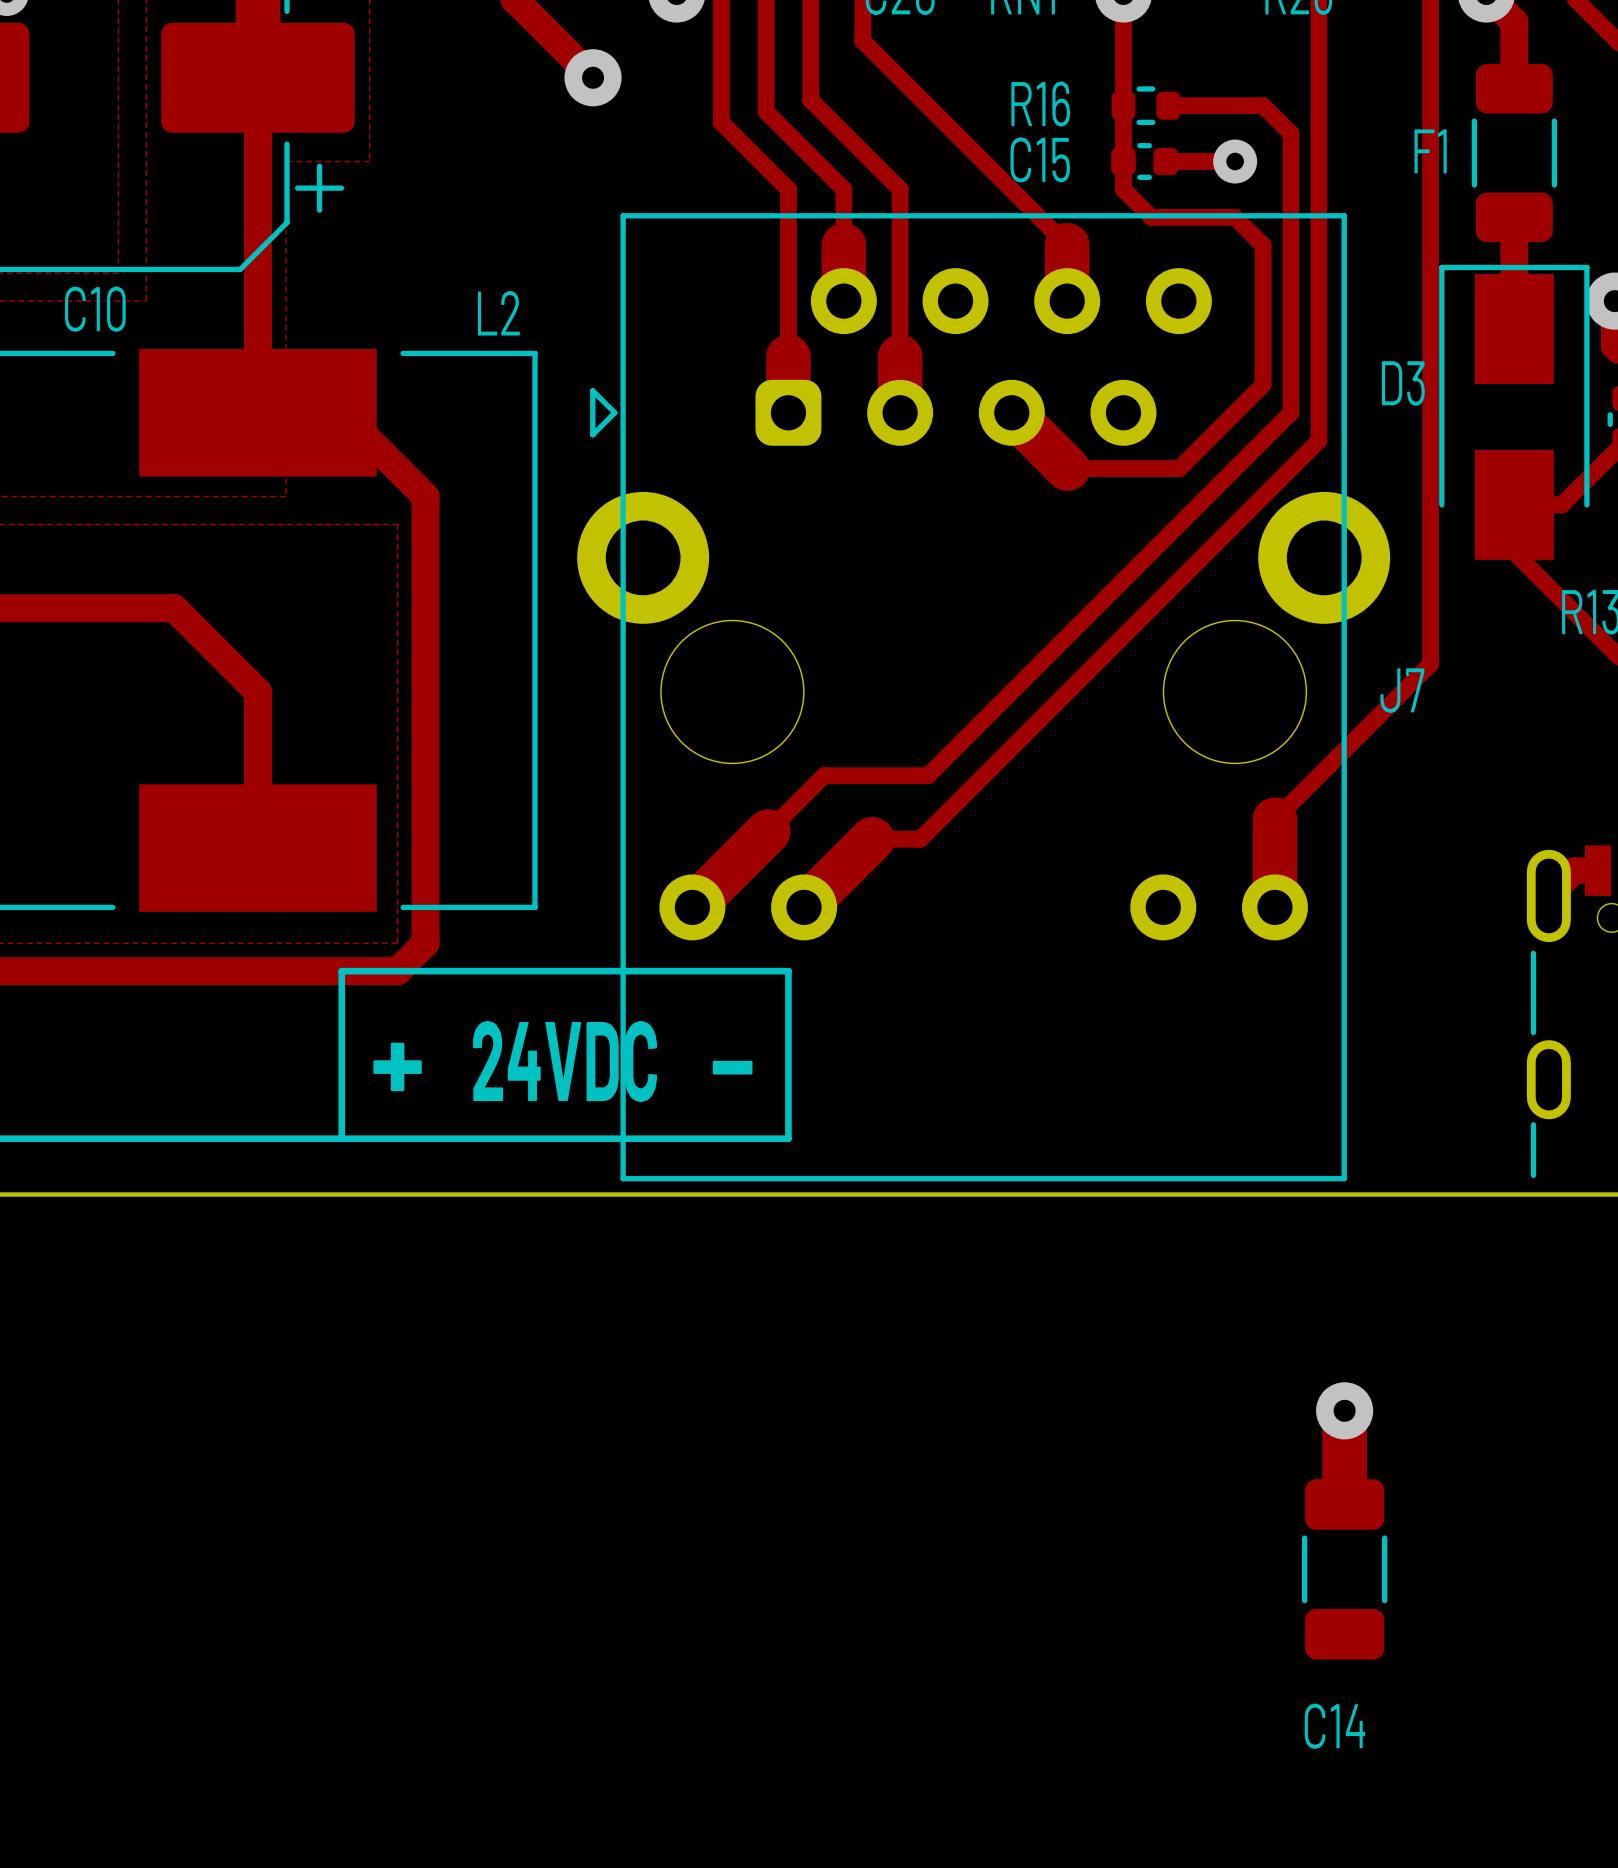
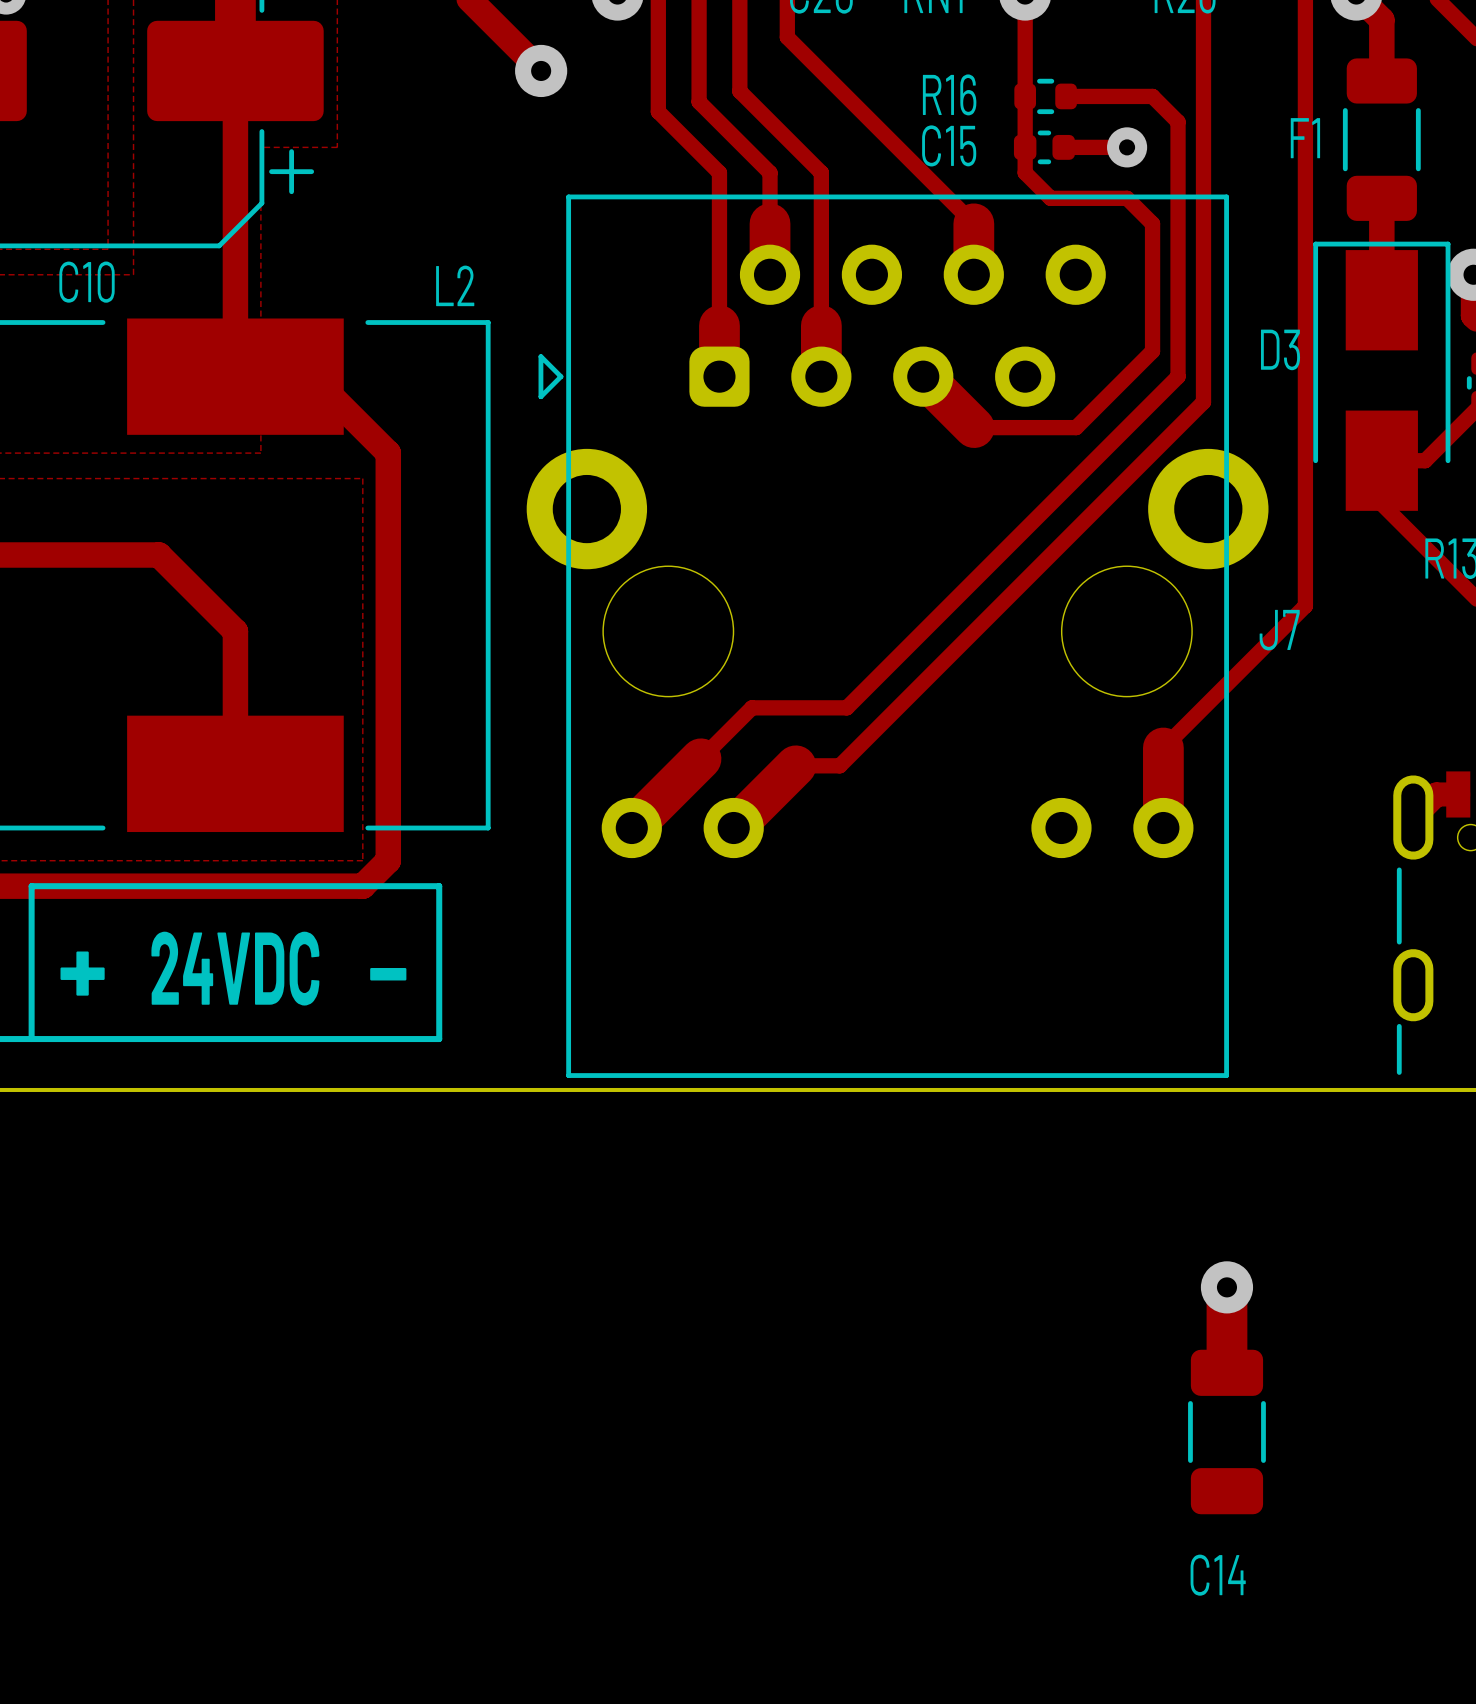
line: (341, 971) (341, 1138) -> (311, 886) (31, 886) (31, 1039)
line: (481, 971) (788, 971) (788, 1138) (481, 1138) -> (439, 886) (439, 1039)
text position: 24VDC (565, 1061) -> 24VDC (235, 968)
text position: + (397, 1066) -> + (82, 973)
text position: - (732, 1067) -> - (388, 974)

